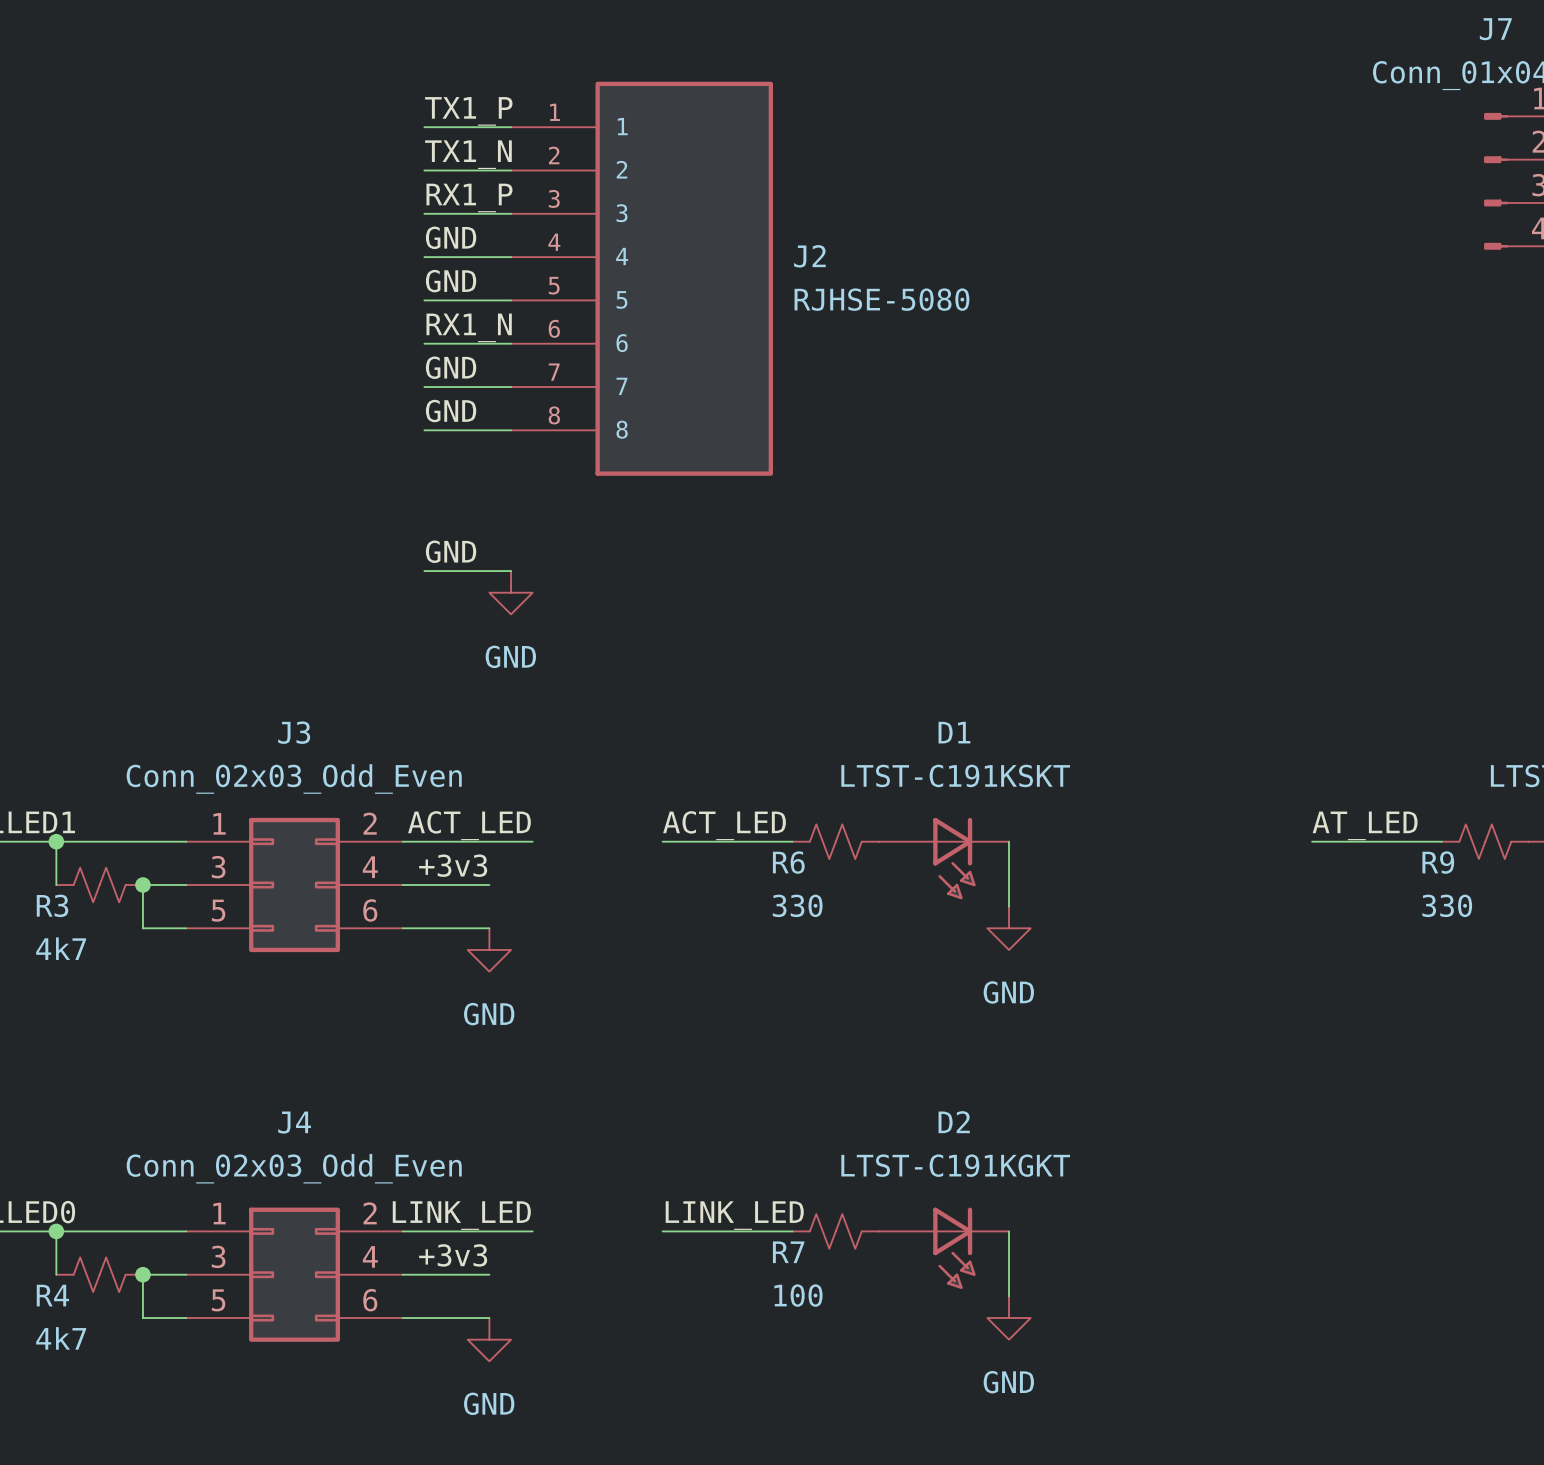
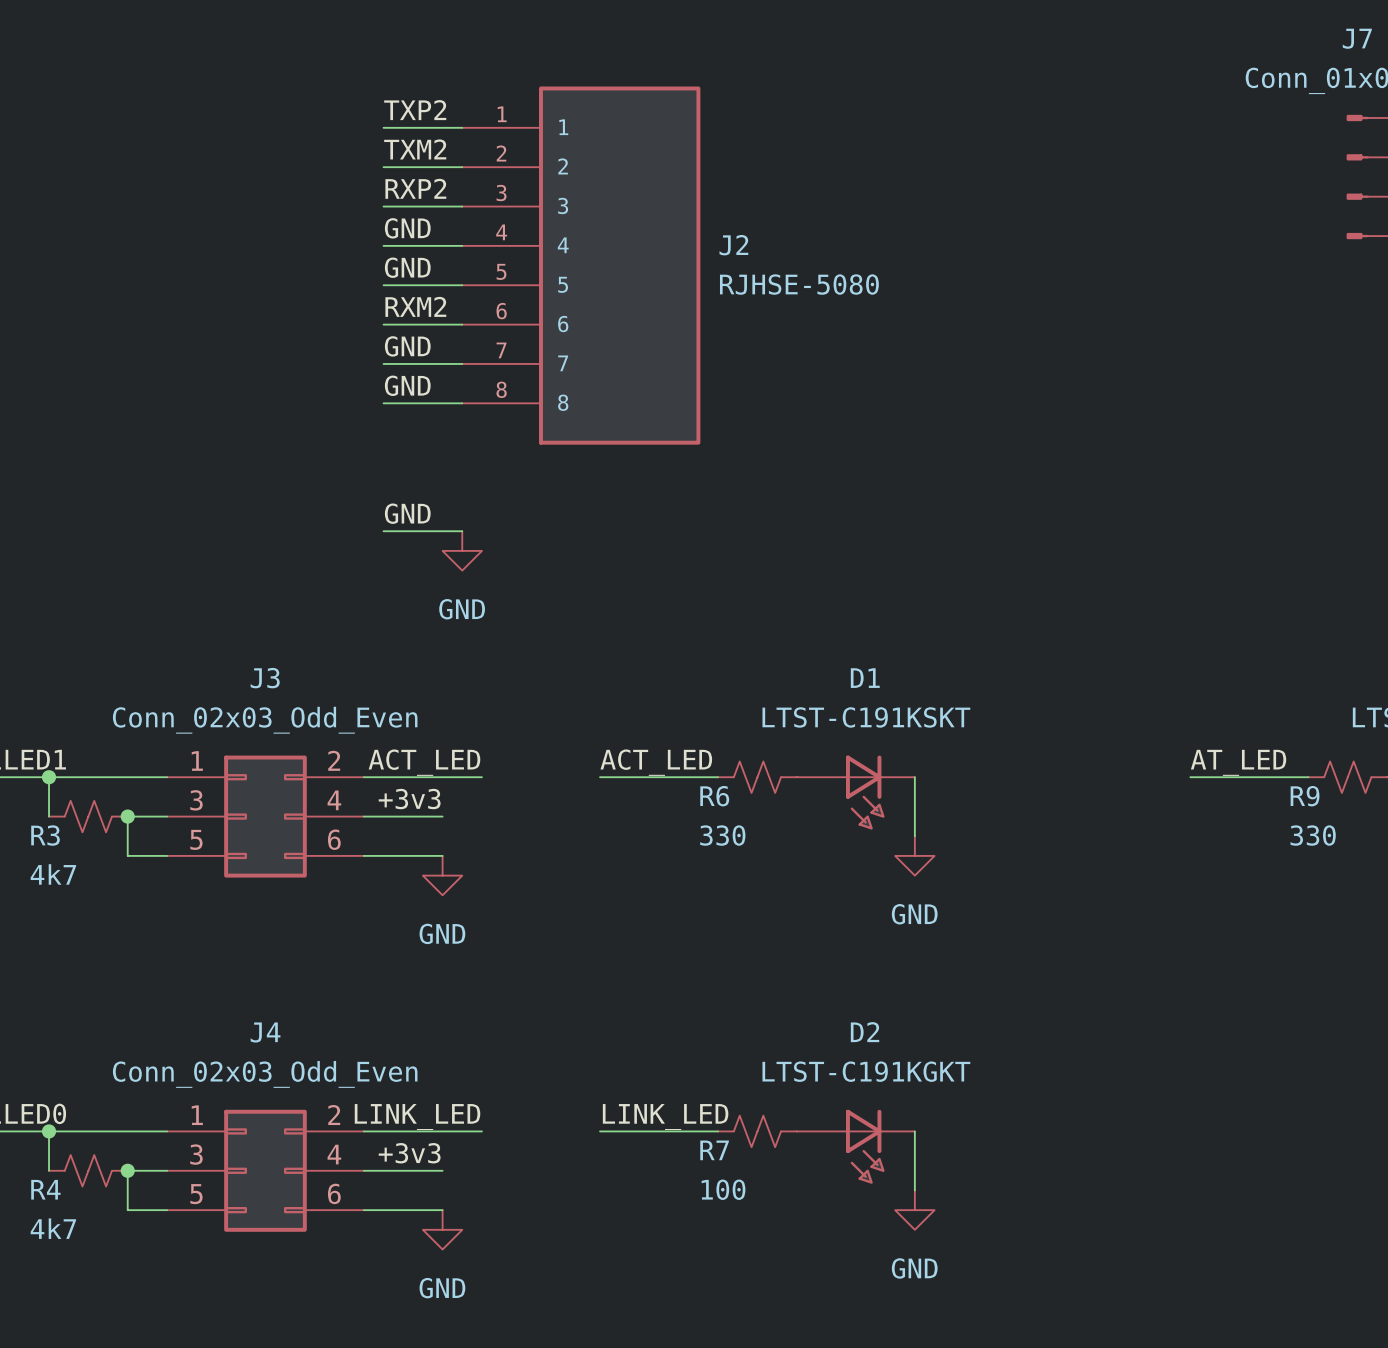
label: TX1_P (468, 111) -> TXP2 (415, 110)
label: TX1_N (468, 154) -> TXM2 (415, 149)
label: RX1_P (469, 197) -> RXP2 (415, 188)
label: RX1_N (469, 327) -> RXM2 (415, 306)

